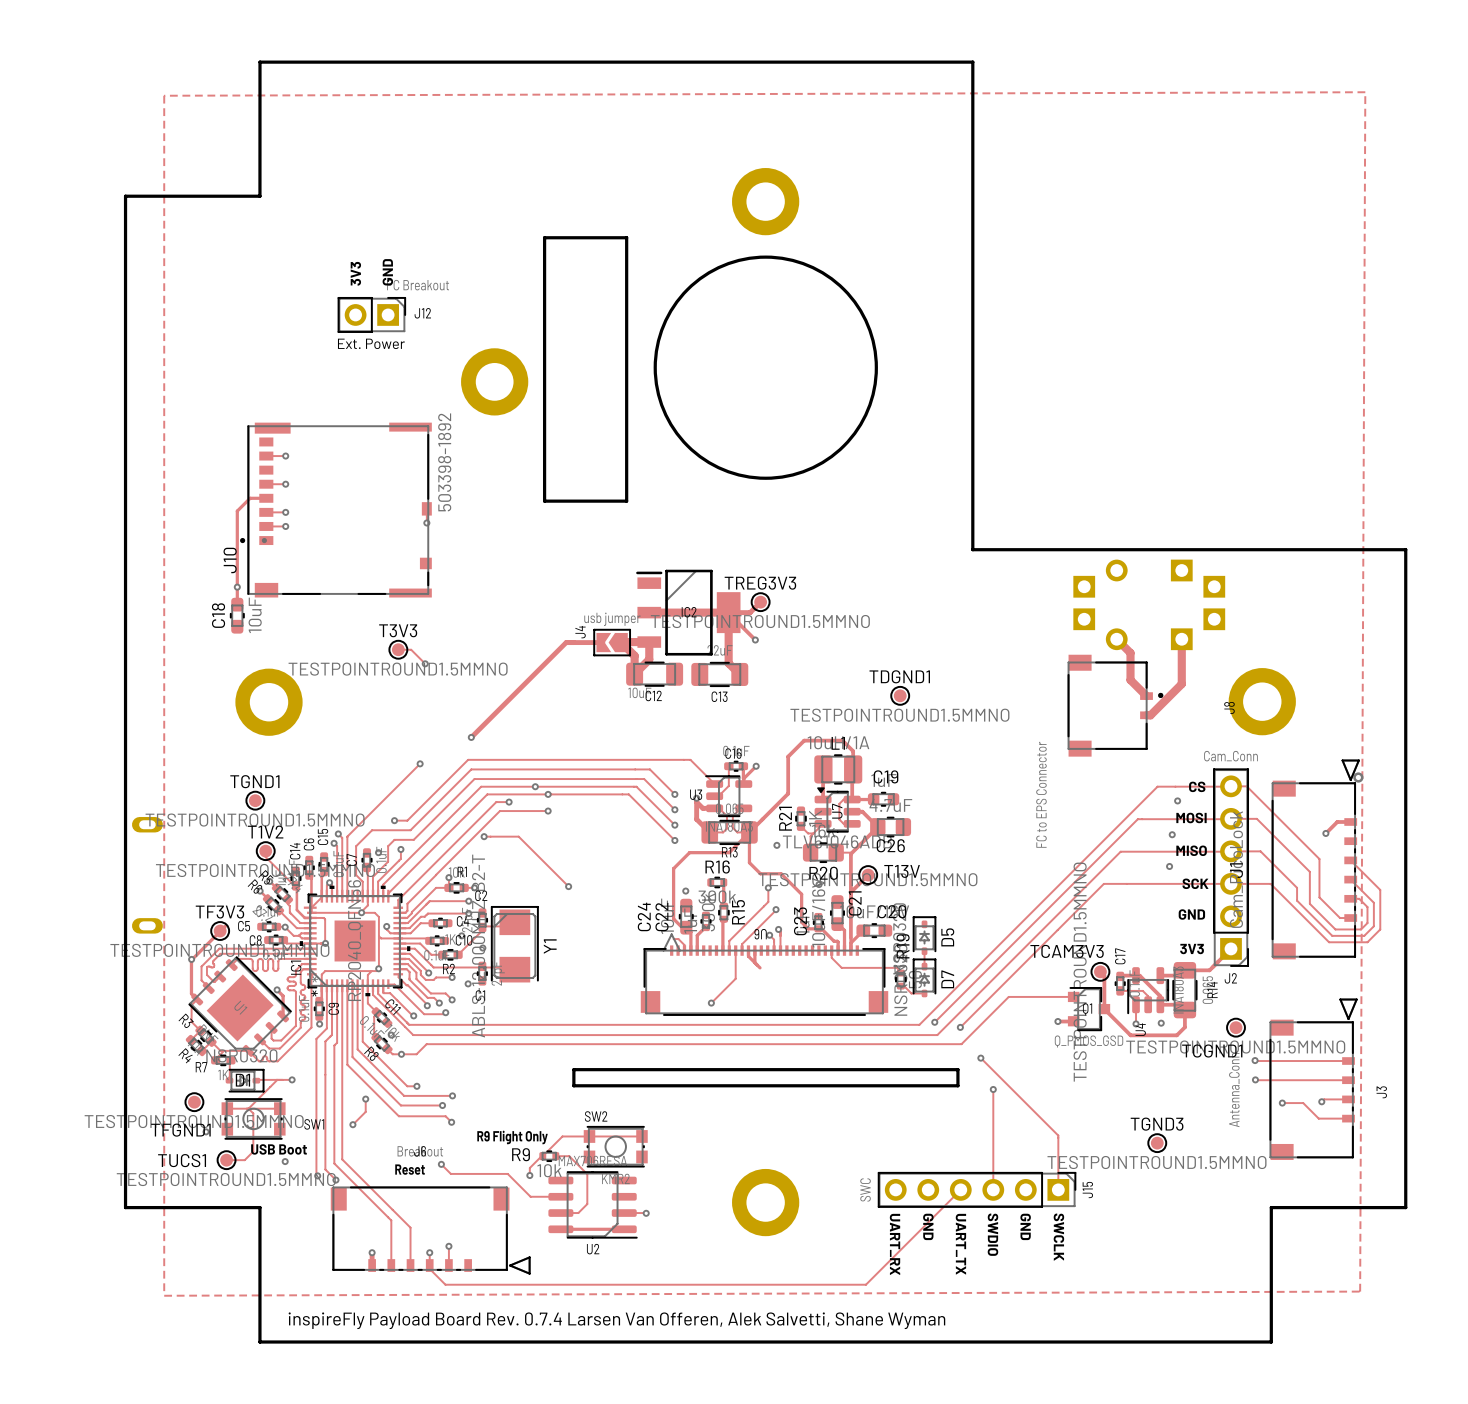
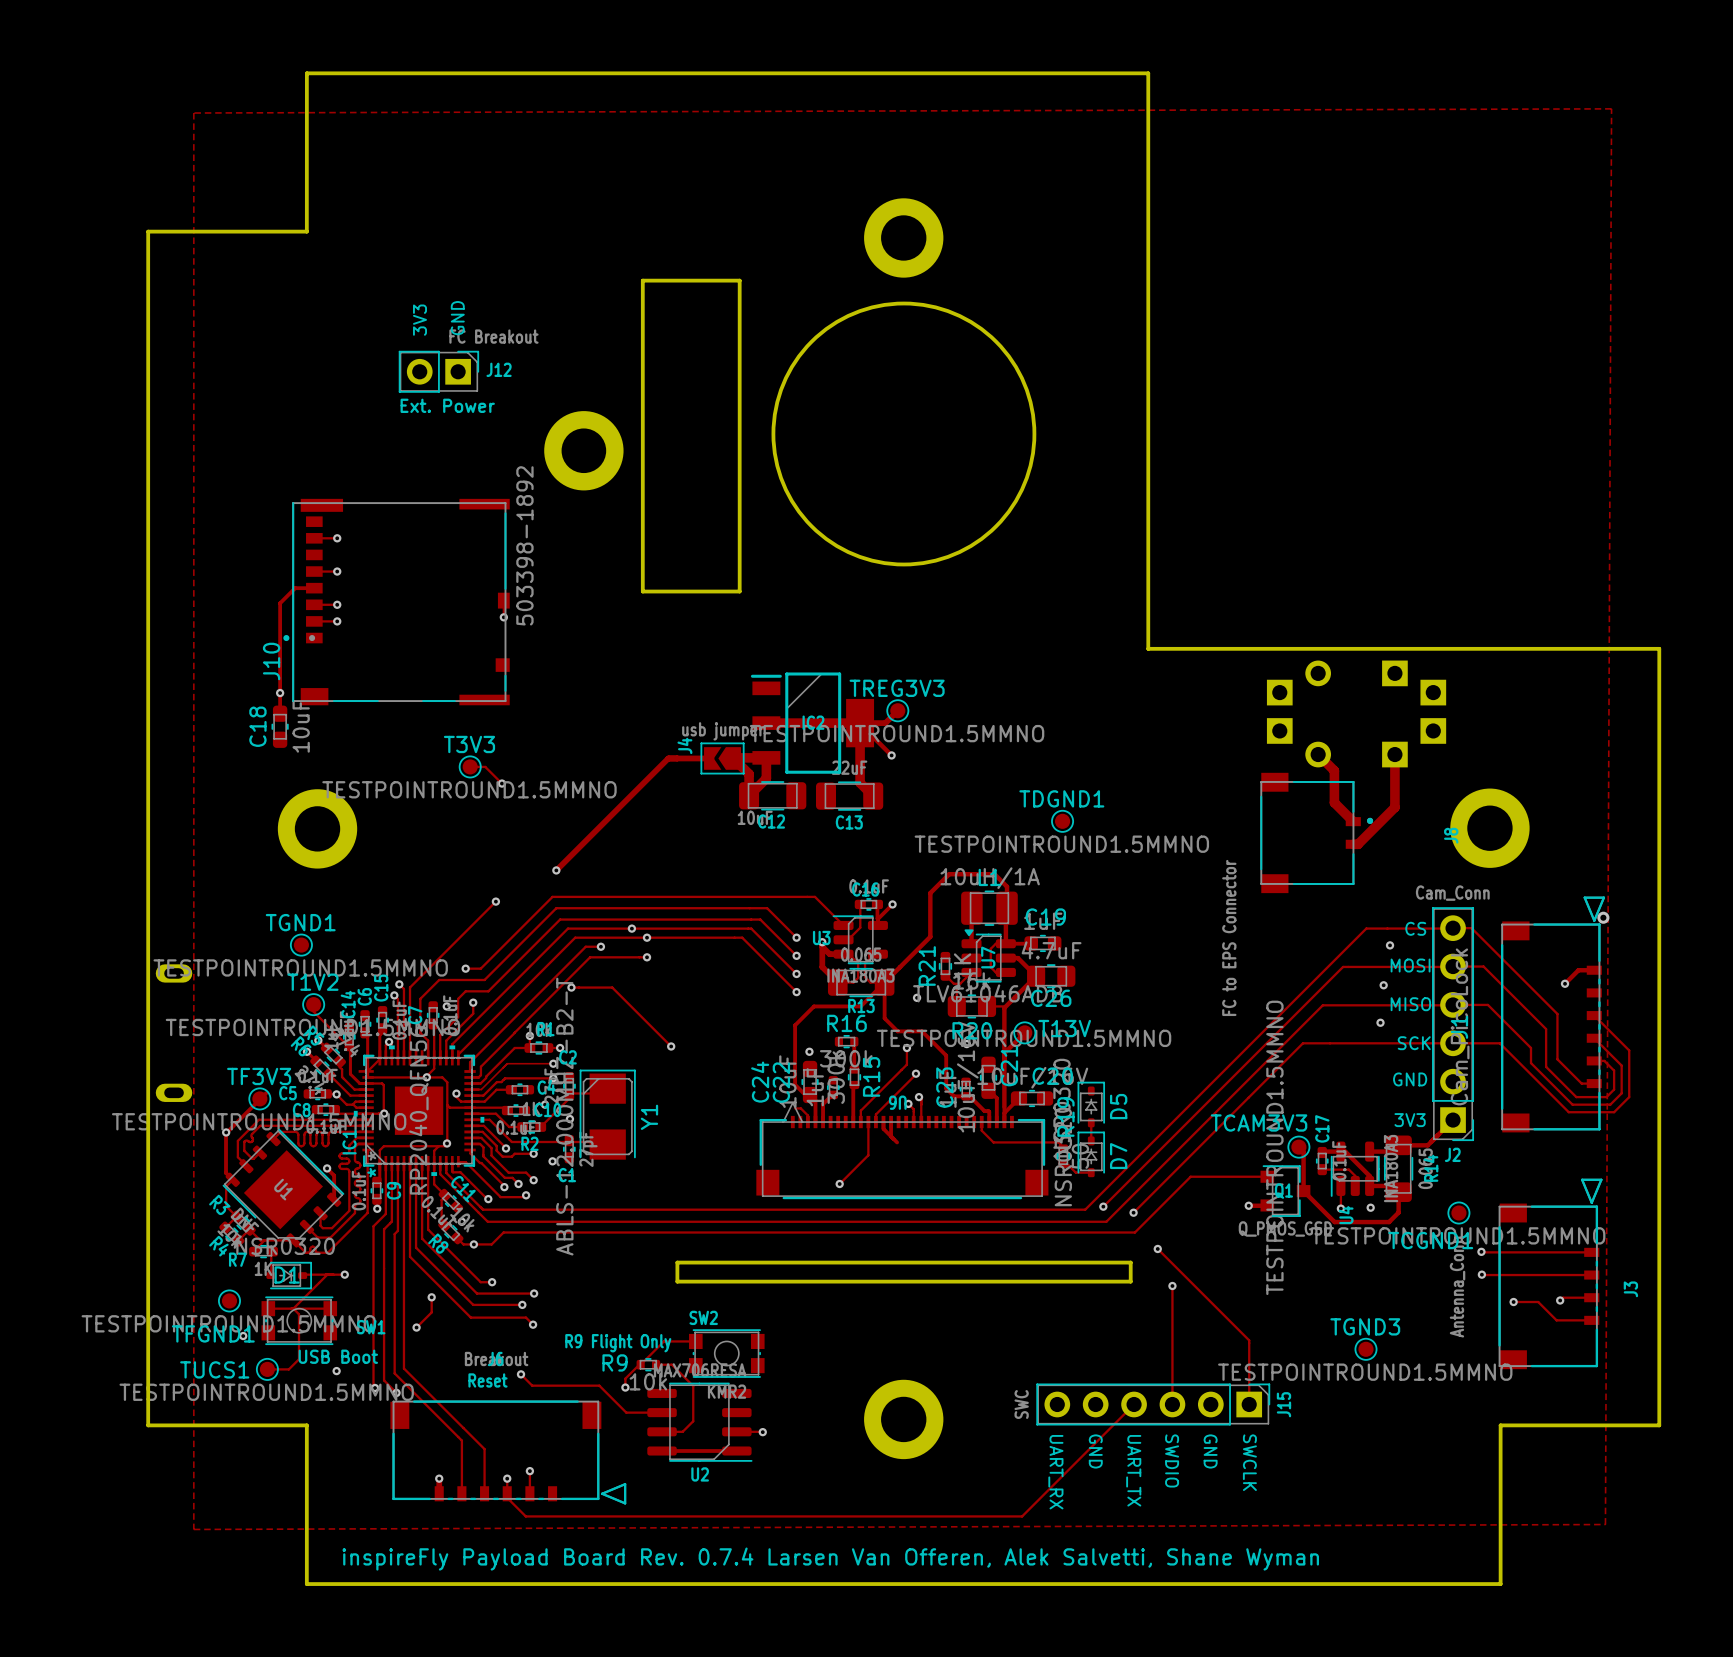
track: (589, 1136) (641, 1136) -> none

